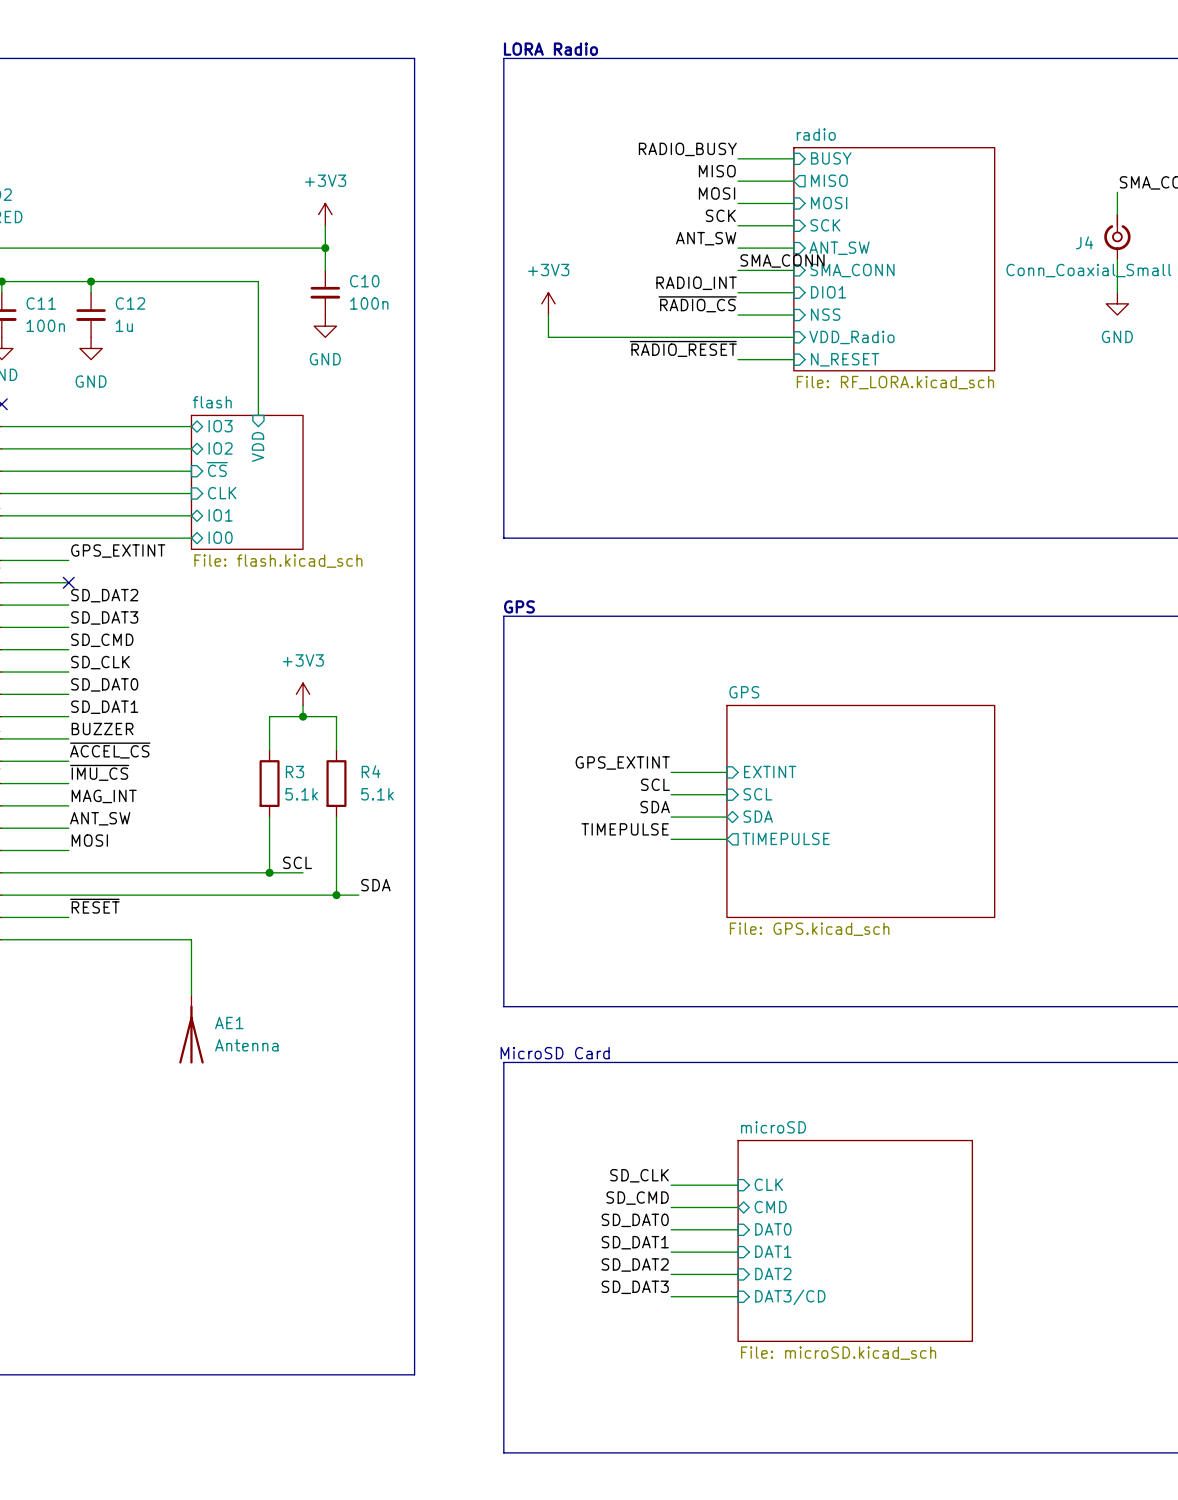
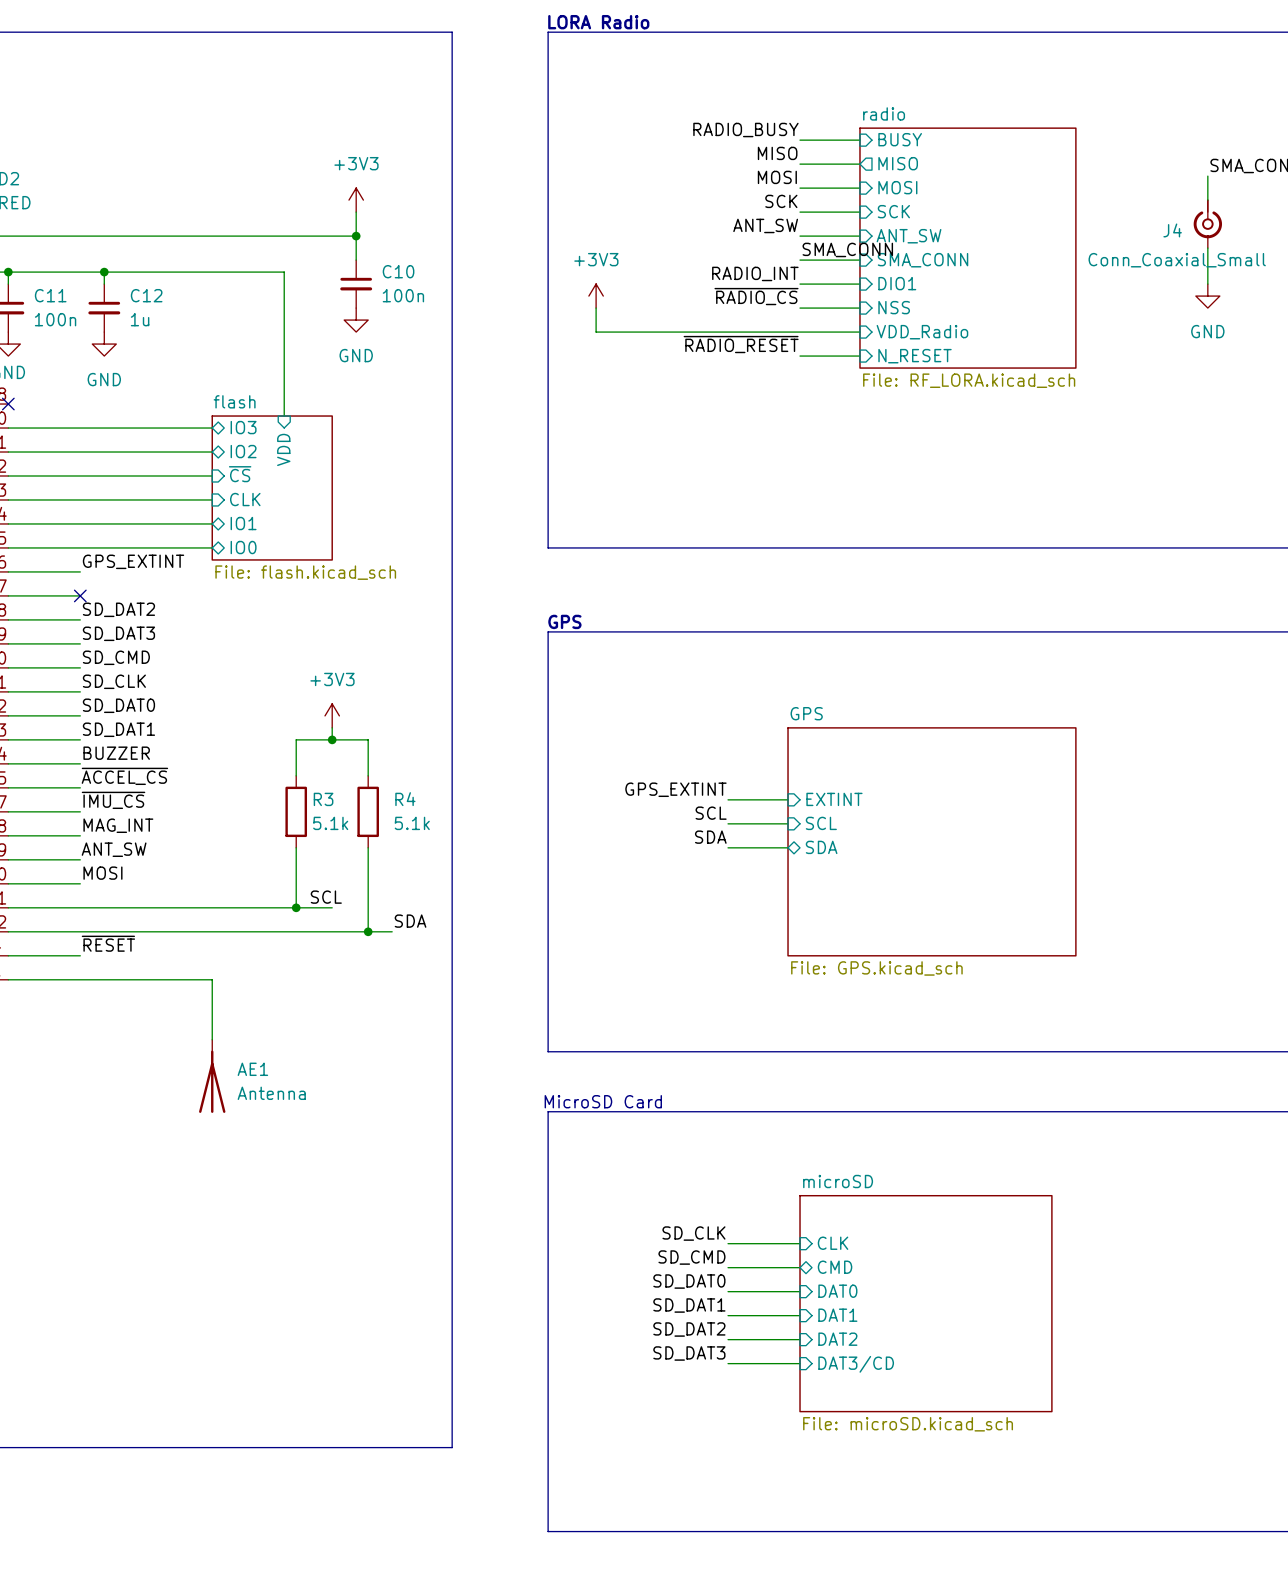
label: TIMEPULSE (625, 829) -> none
sheet pin: TIMEPULSE (786, 838) -> none
wire: (671, 839) (726, 839) -> none

